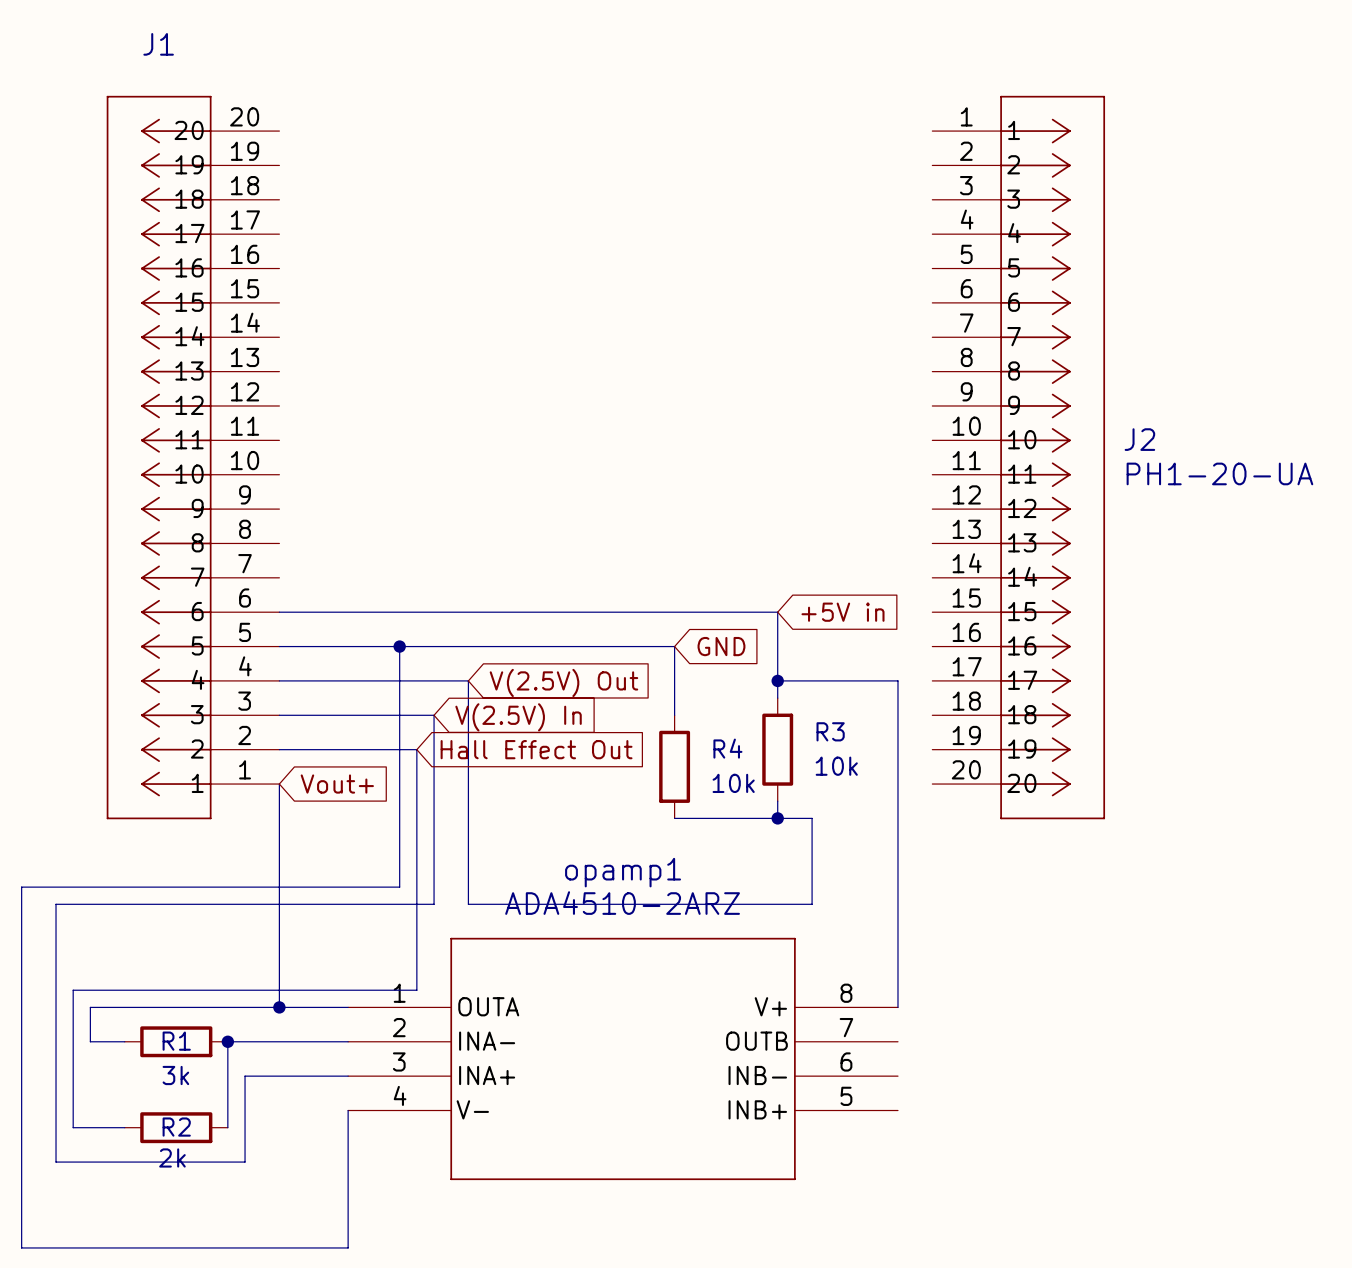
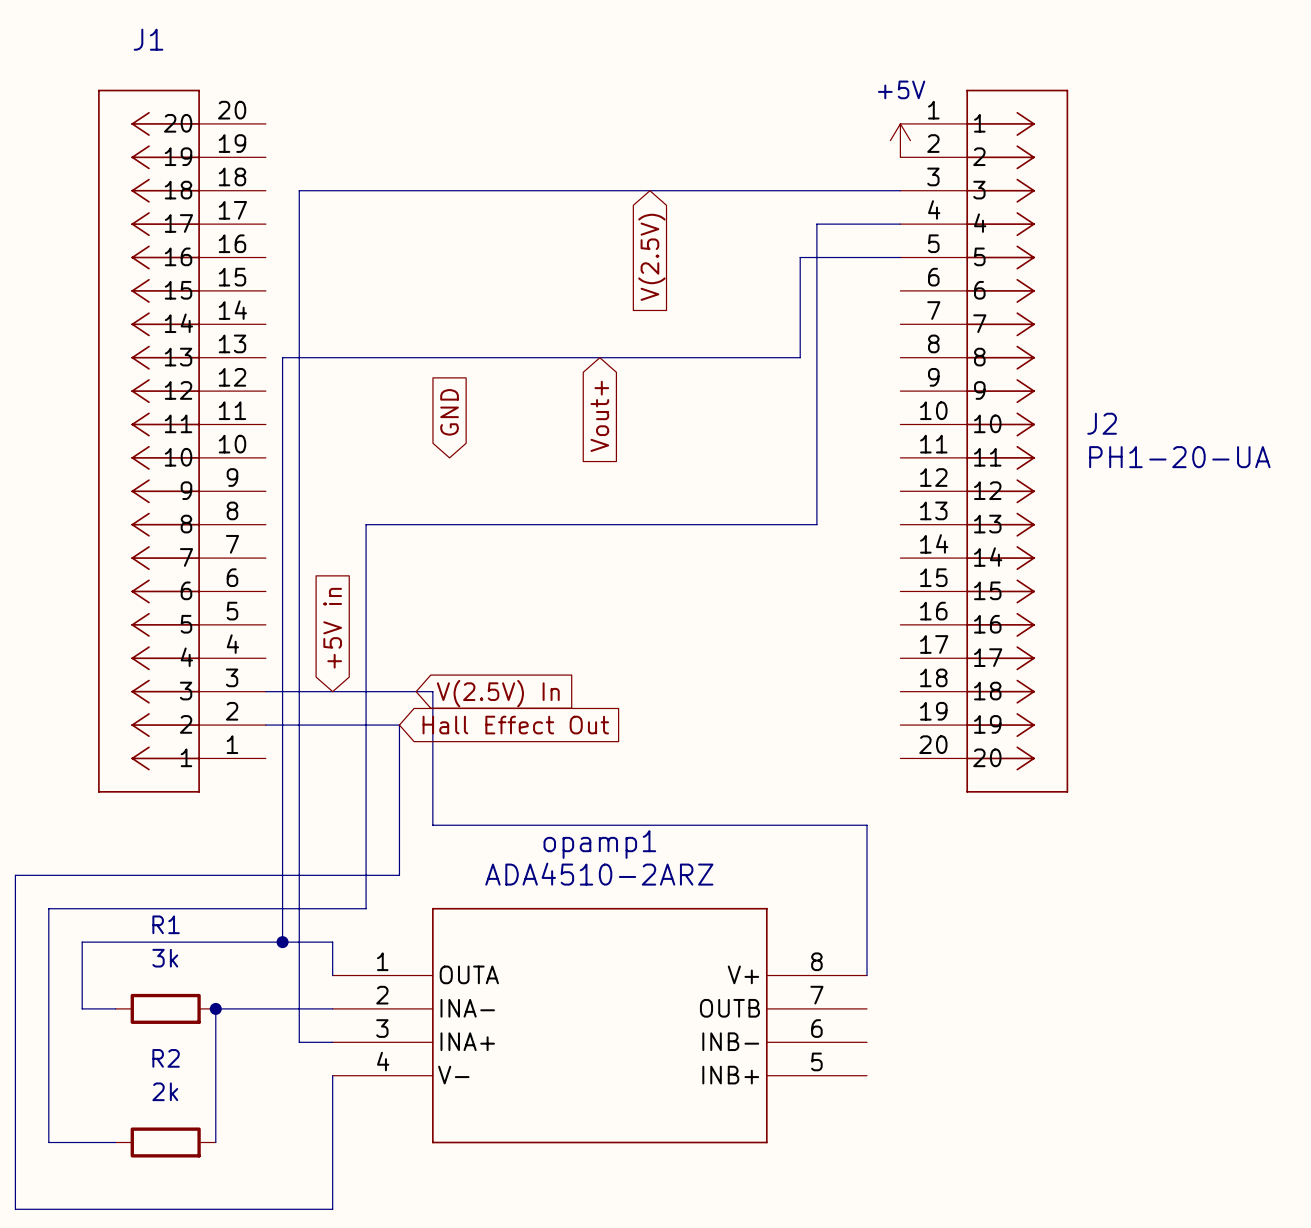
power symbol: none -> +5V (900, 140)
wire: none -> (900, 190) (299, 190) (299, 1042)
wire: none -> (900, 224) (816, 224) (816, 524) (366, 524) (366, 908) (48, 908)
global label: none -> V(2.5V) (651, 257)
wire: none -> (900, 257) (800, 257) (800, 357) (282, 357) (282, 942)
global label: none -> Vout+ (599, 416)
wire: (279, 612) (777, 612) (777, 698) -> none
global label: +5V in (842, 612) -> none
wire: (279, 646) (674, 646) (674, 715) -> none
wire: (399, 646) (399, 887) (21, 887) (21, 904) -> none
junction: (399, 646) -> none
global label rotation: 0° (721, 646) -> 90° counterclockwise (449, 412)
global label position: GND (721, 646) -> GND (449, 412)
global label: none -> +5V in (332, 628)
wire: (279, 680) (468, 680) (468, 904) (812, 904) (812, 818) (674, 818) -> none
wire: (777, 680) (897, 680) (897, 852) -> (416, 691) (432, 691) (432, 825) (867, 825)
junction: (777, 680) -> none
global label: V(2.5V) Out (563, 682) -> none
wire: (434, 715) (434, 904) (416, 904) (416, 990) (73, 990) (73, 1127) (124, 1127) -> none
R3: 10k (777, 749) -> none
R4: 10k (674, 766) -> none
wire: (279, 784) (279, 1007) -> none
global label: Vout+ (337, 784) -> none
wire: (777, 801) (777, 818) -> none
junction: (777, 818) -> none
wire: (56, 904) (56, 938) -> (48, 875) (15, 875)
wire: (90, 1007) (348, 1007) -> (82, 975) (82, 942) (332, 942) (332, 975)
junction position: (279, 1007) -> (282, 942)
R1 name position: R1 (176, 1041) -> R1 (166, 924)
R1 value position: 3k (175, 1075) -> 3k (165, 958)
wire: (313, 1076) (245, 1076) (245, 1162) (56, 1162) -> (115, 1142) (48, 1142) (48, 1125)
R2 position: (176, 1127) -> (165, 1142)
R2 name position: R2 (176, 1127) -> R2 (166, 1058)
wire: none -> (215, 1092) (215, 1142)
R2 value position: 2k (172, 1157) -> 2k (165, 1091)

